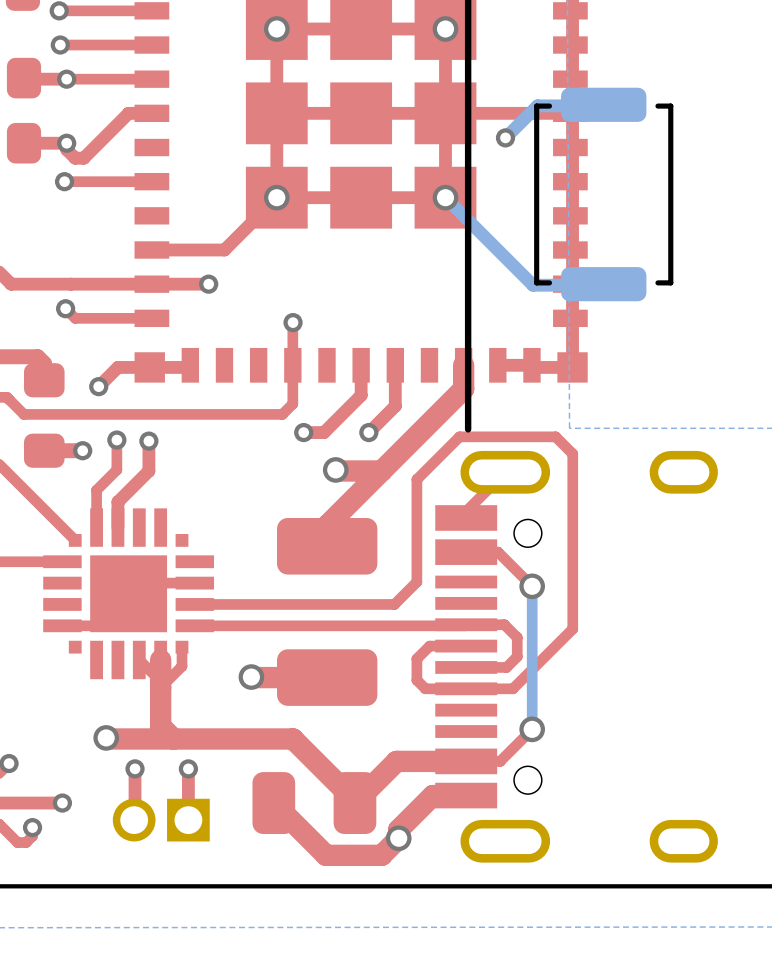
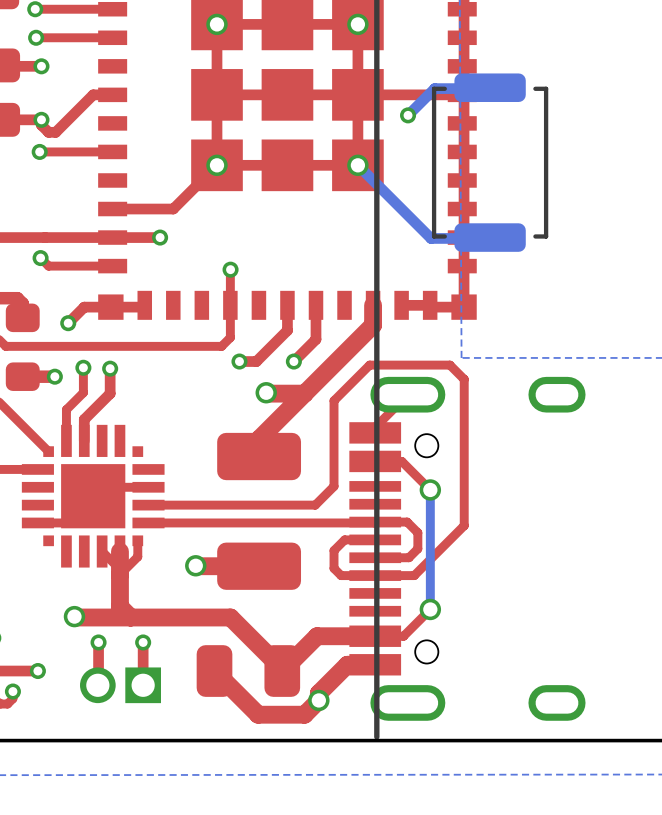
top track: (151, 79) (66, 79) -> none
line: none -> (376, 358) (376, 737)

